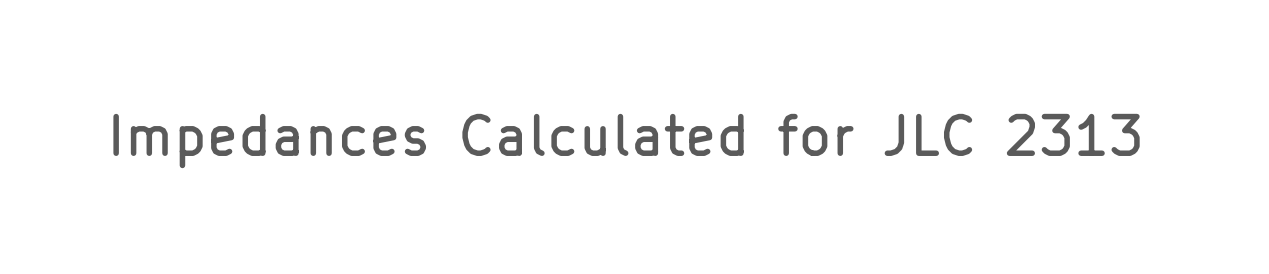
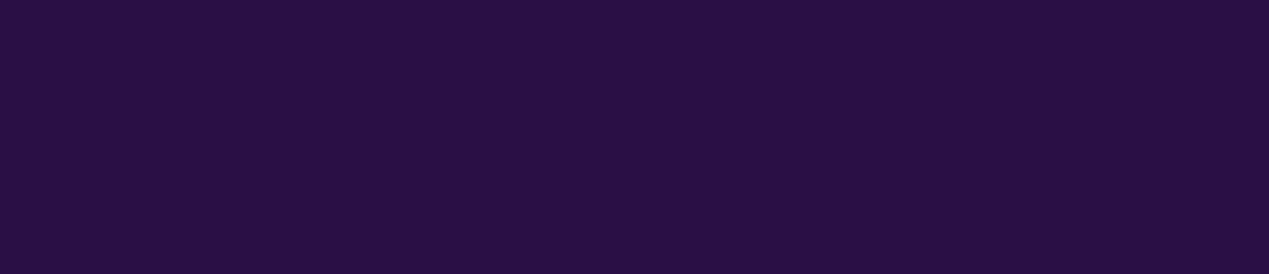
text: Impedances Calculated for JLC 2313 (626, 141) -> none

